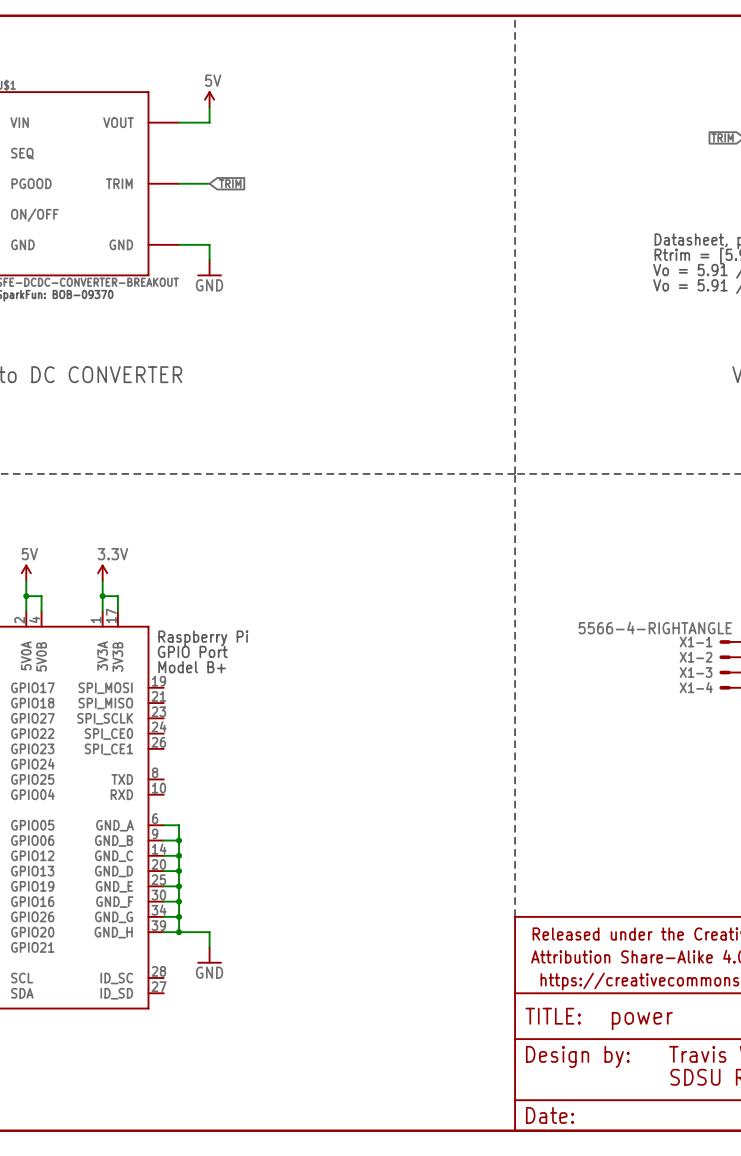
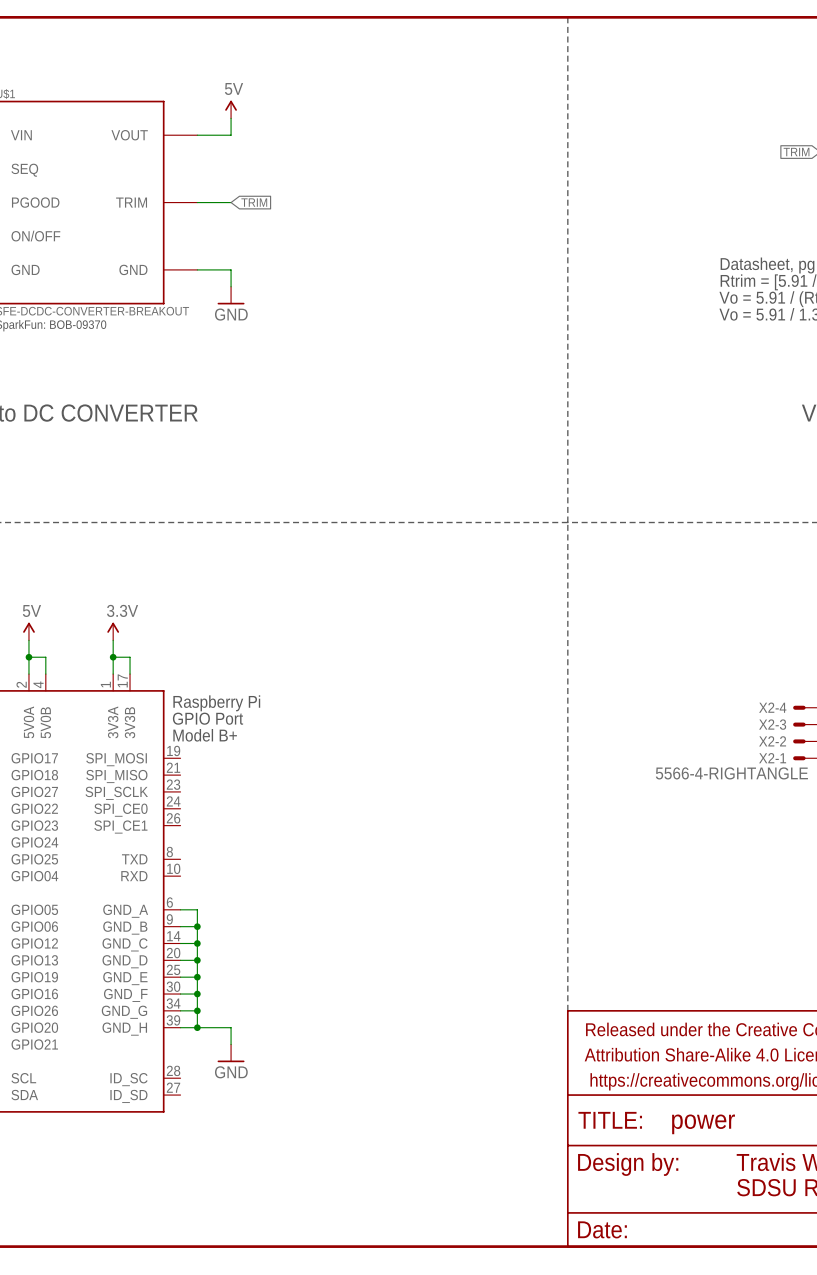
X1-1 value: 5566-4-RIGHTANGLE (655, 627) -> none
X1-1 name: X1-1 (696, 641) -> X2-4 (772, 707)
X1-2 name: X1-2 (696, 657) -> X2-3 (772, 724)
X1-3 name: X1-3 (696, 672) -> X2-2 (772, 741)
X1-4 name: X1-4 (696, 687) -> X2-1 (772, 758)
X1-4 value: none -> 5566-4-RIGHTANGLE (731, 773)

